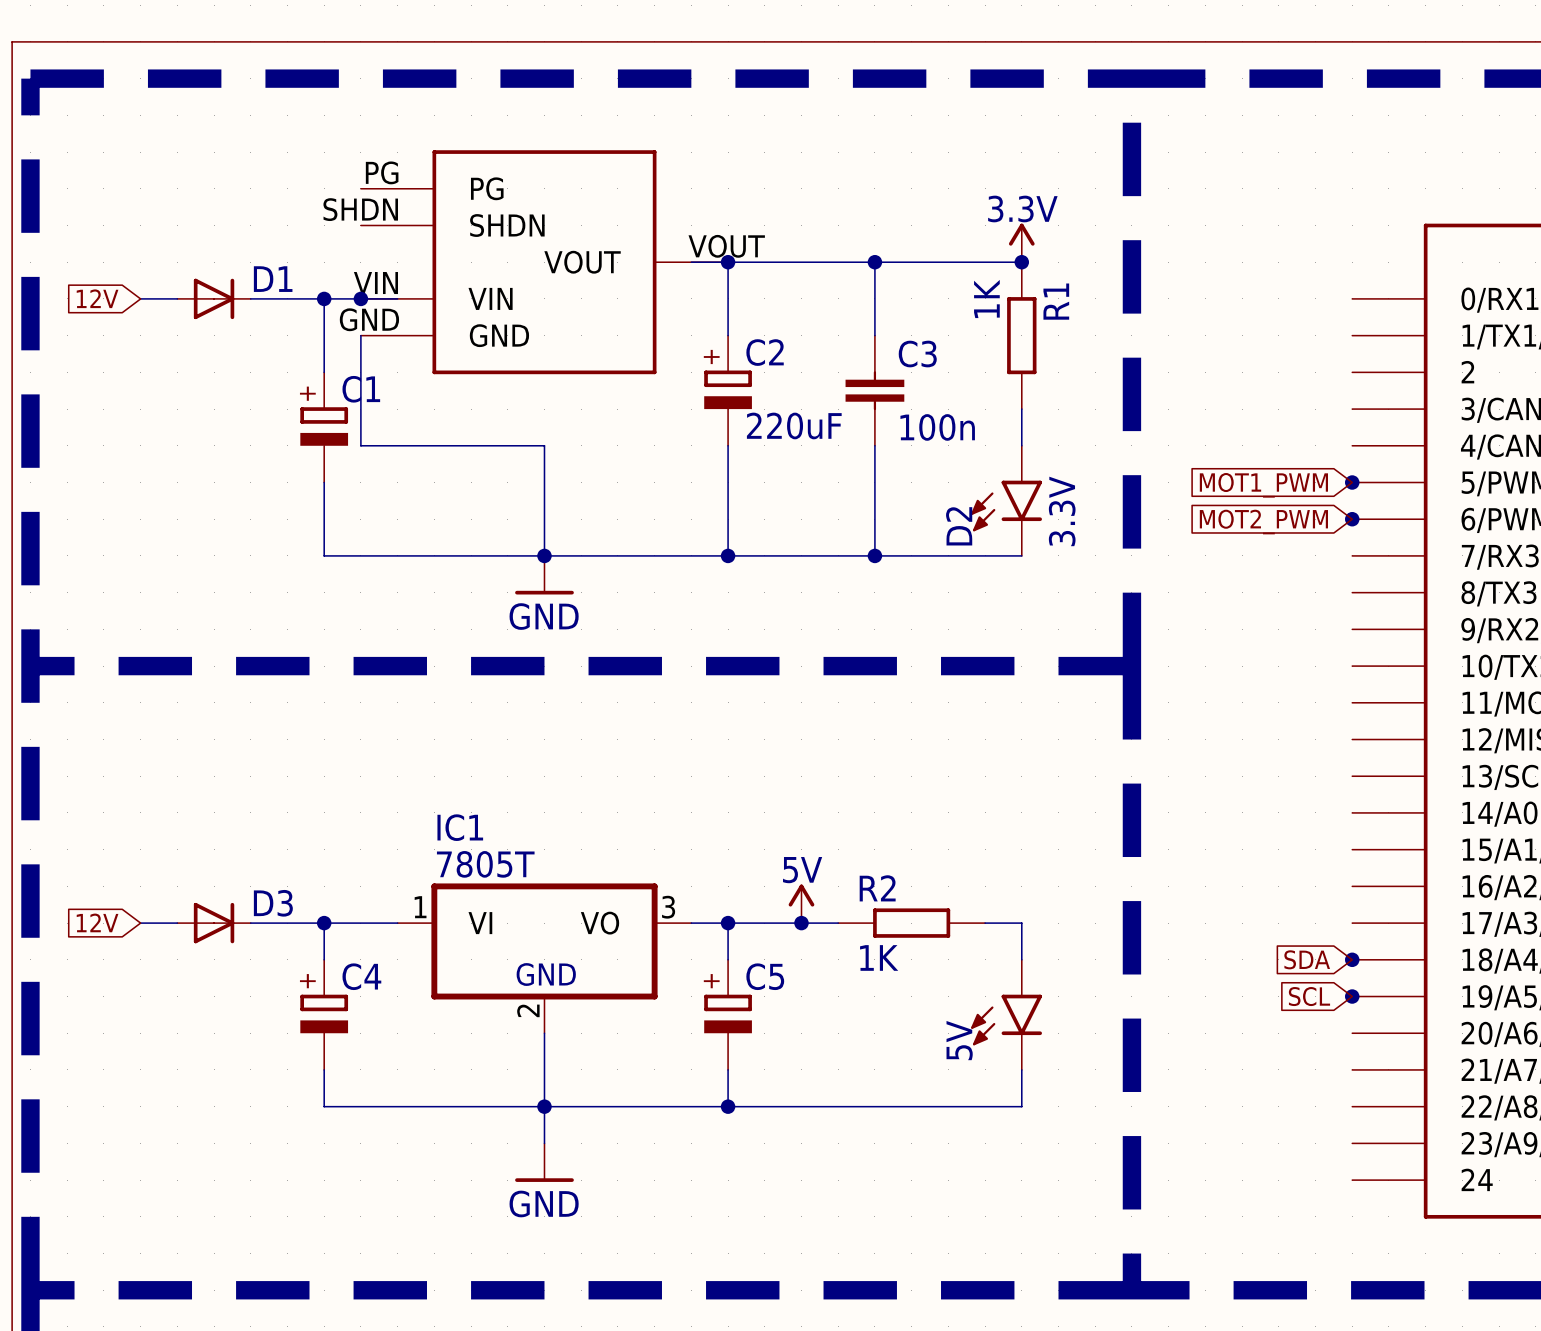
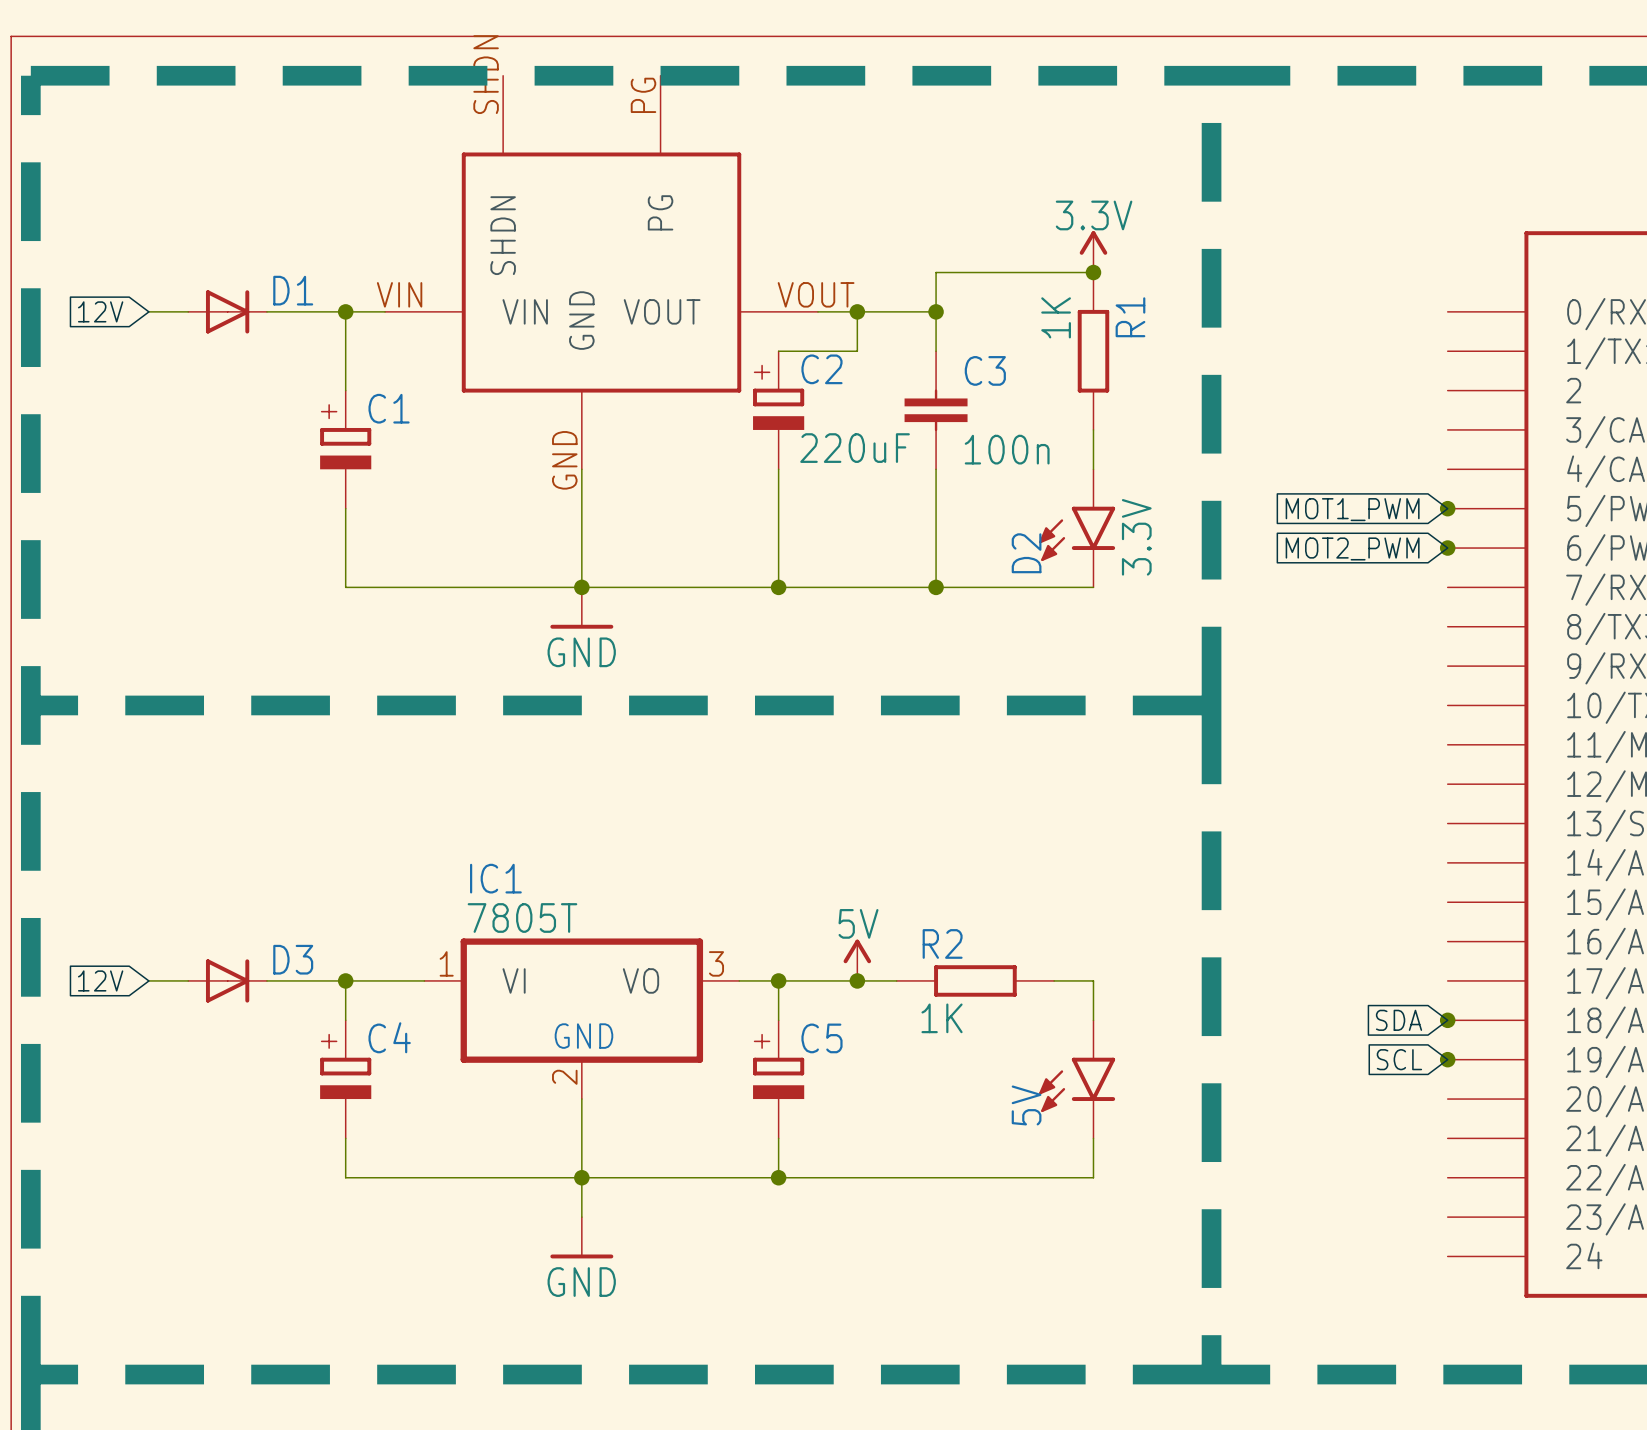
part: (544, 262) -> none
part: none -> (601, 272)
wire: (691, 262) (874, 262) -> none
wire: (728, 262) (728, 335) -> (857, 311) (857, 351) (778, 351)
junction: (728, 262) -> none
junction position: (874, 262) -> (936, 311)
junction: (360, 298) -> none
wire: none -> (817, 311) (936, 311)
junction: none -> (857, 311)
wire: (360, 335) (360, 445) (544, 445) -> none

